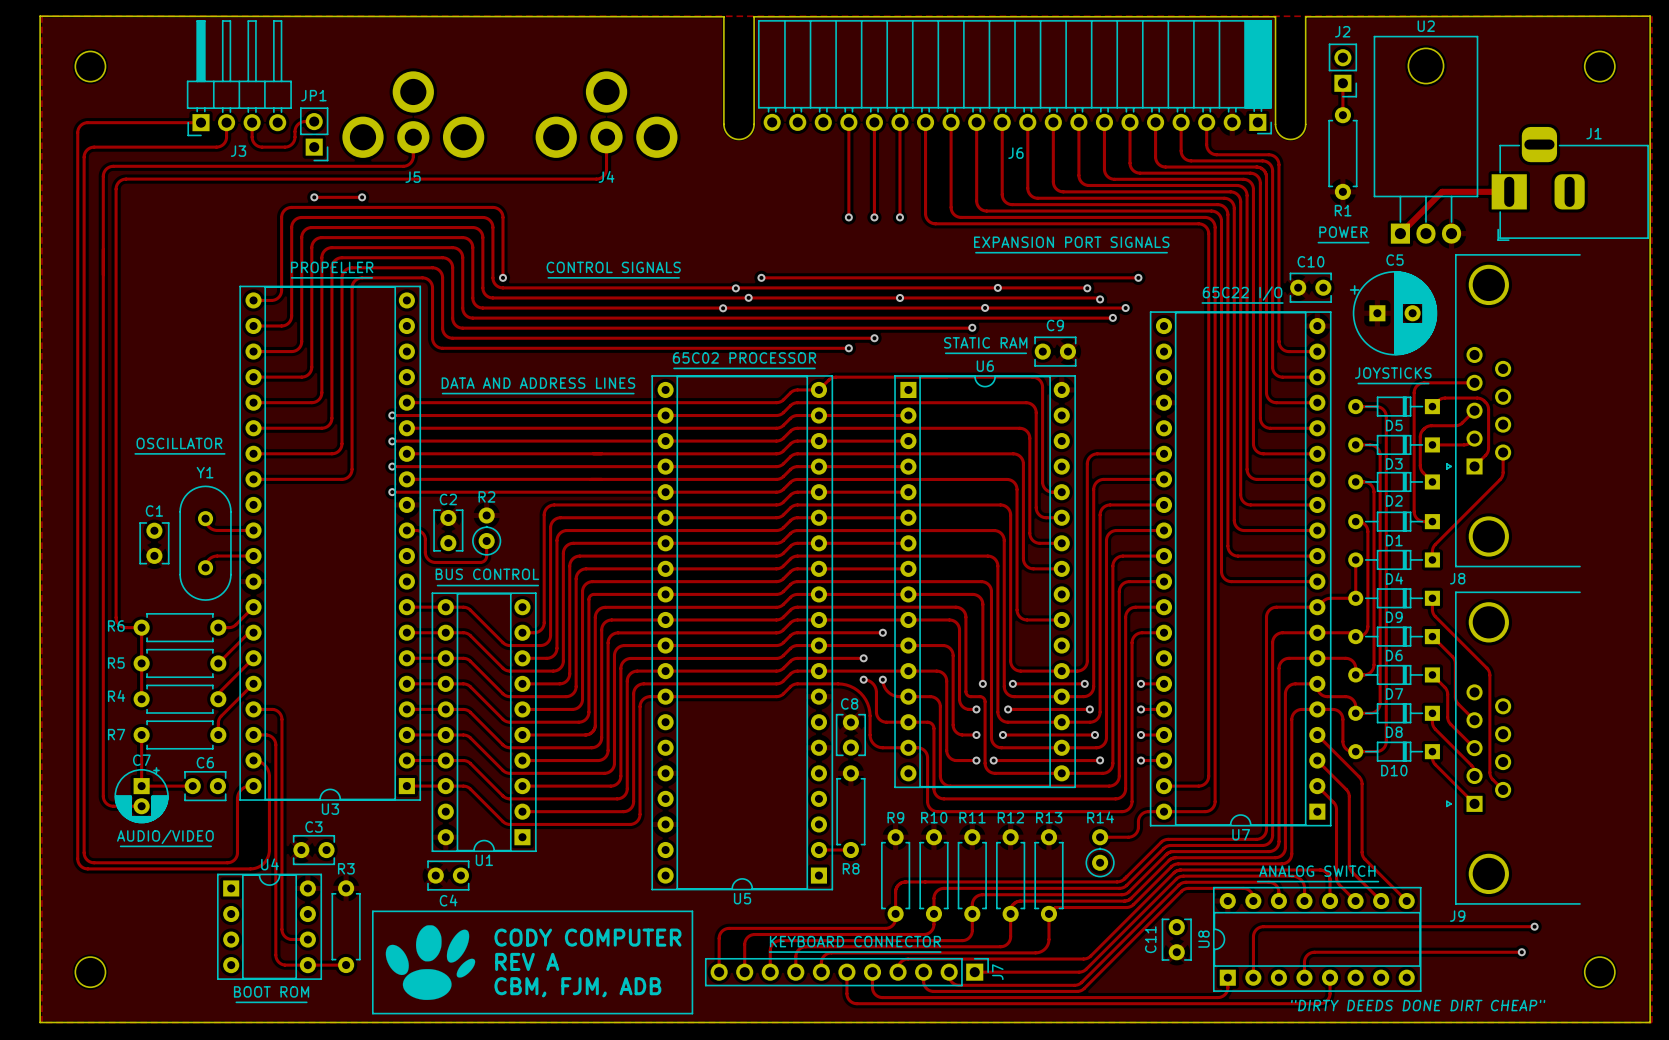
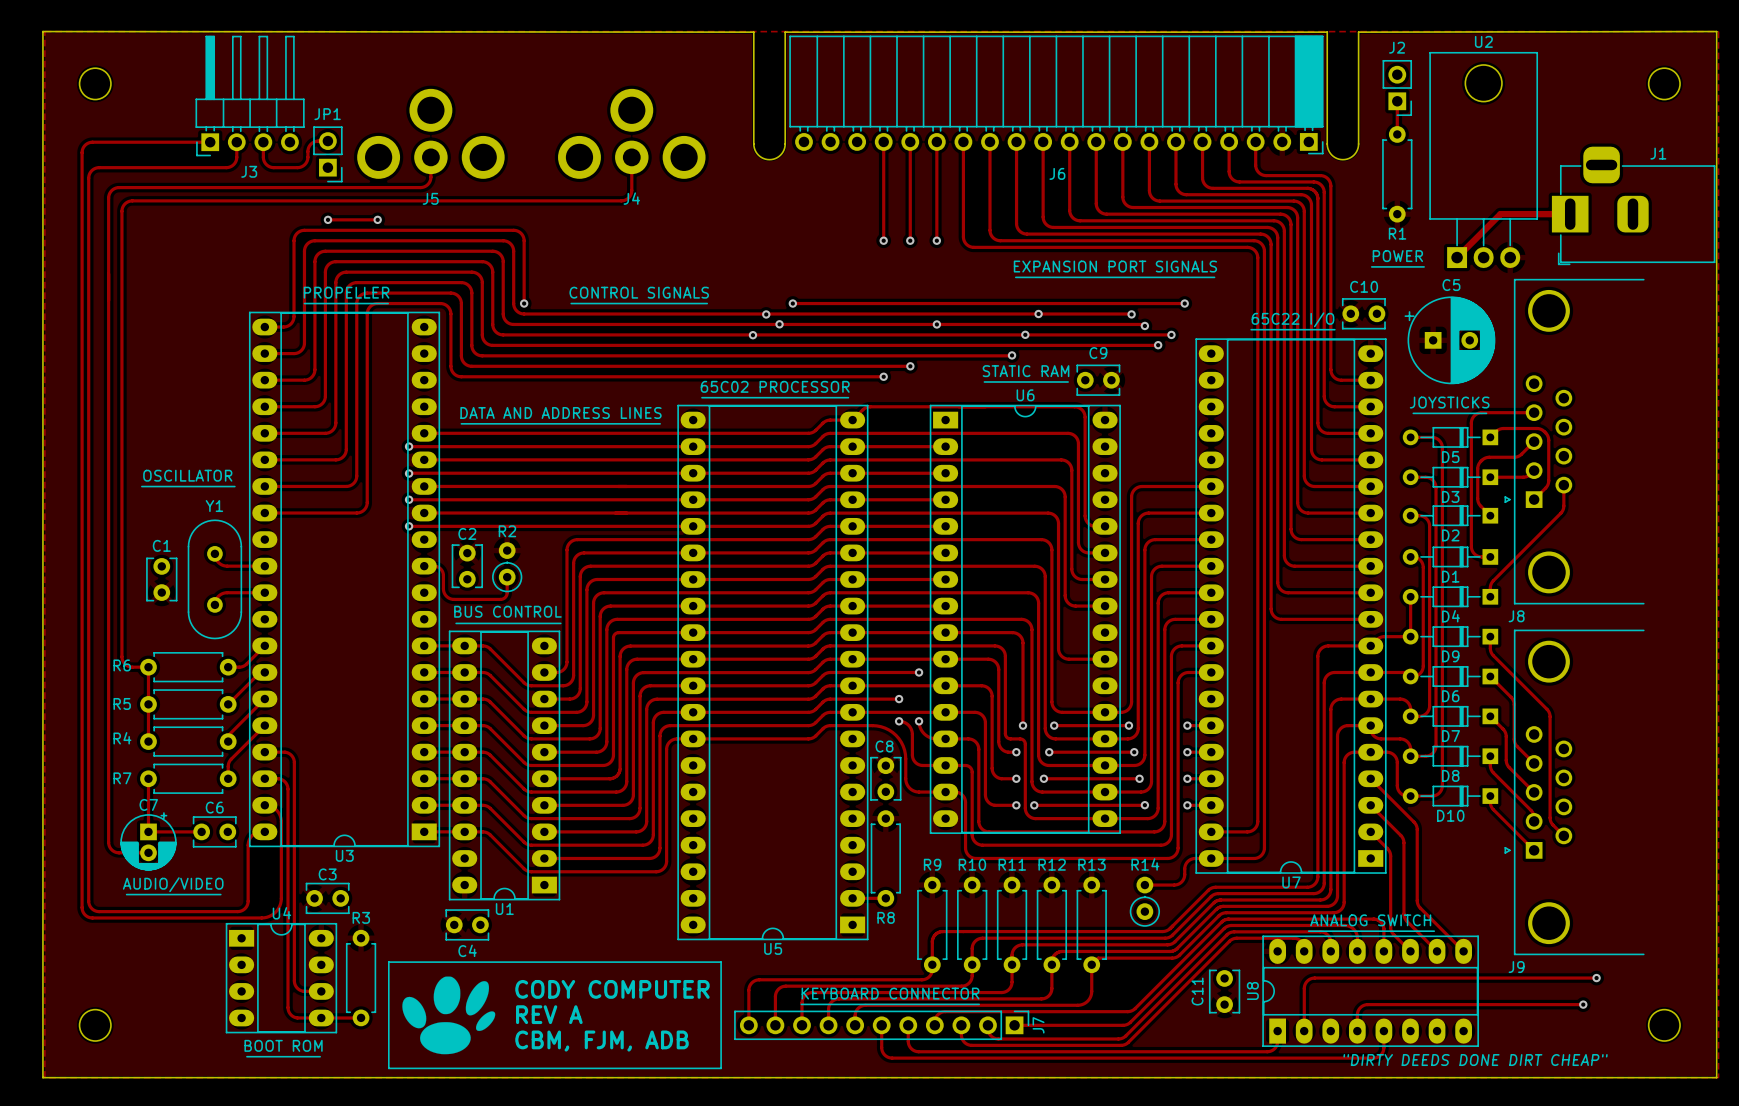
U3 footprint: [239, 285, 421, 801] -> [249, 311, 440, 848]
U7 footprint: [1150, 311, 1332, 827] -> [1195, 338, 1387, 874]
U5 footprint: [651, 375, 833, 891] -> [677, 404, 869, 941]
U6 footprint: [894, 375, 1076, 788] -> [929, 404, 1121, 834]
U1 footprint: [431, 592, 537, 852] -> [448, 630, 561, 901]
U4 footprint: [217, 873, 322, 980] -> [225, 923, 338, 1034]
U8 footprint: [1213, 887, 1422, 992] -> [1262, 935, 1479, 1047]

